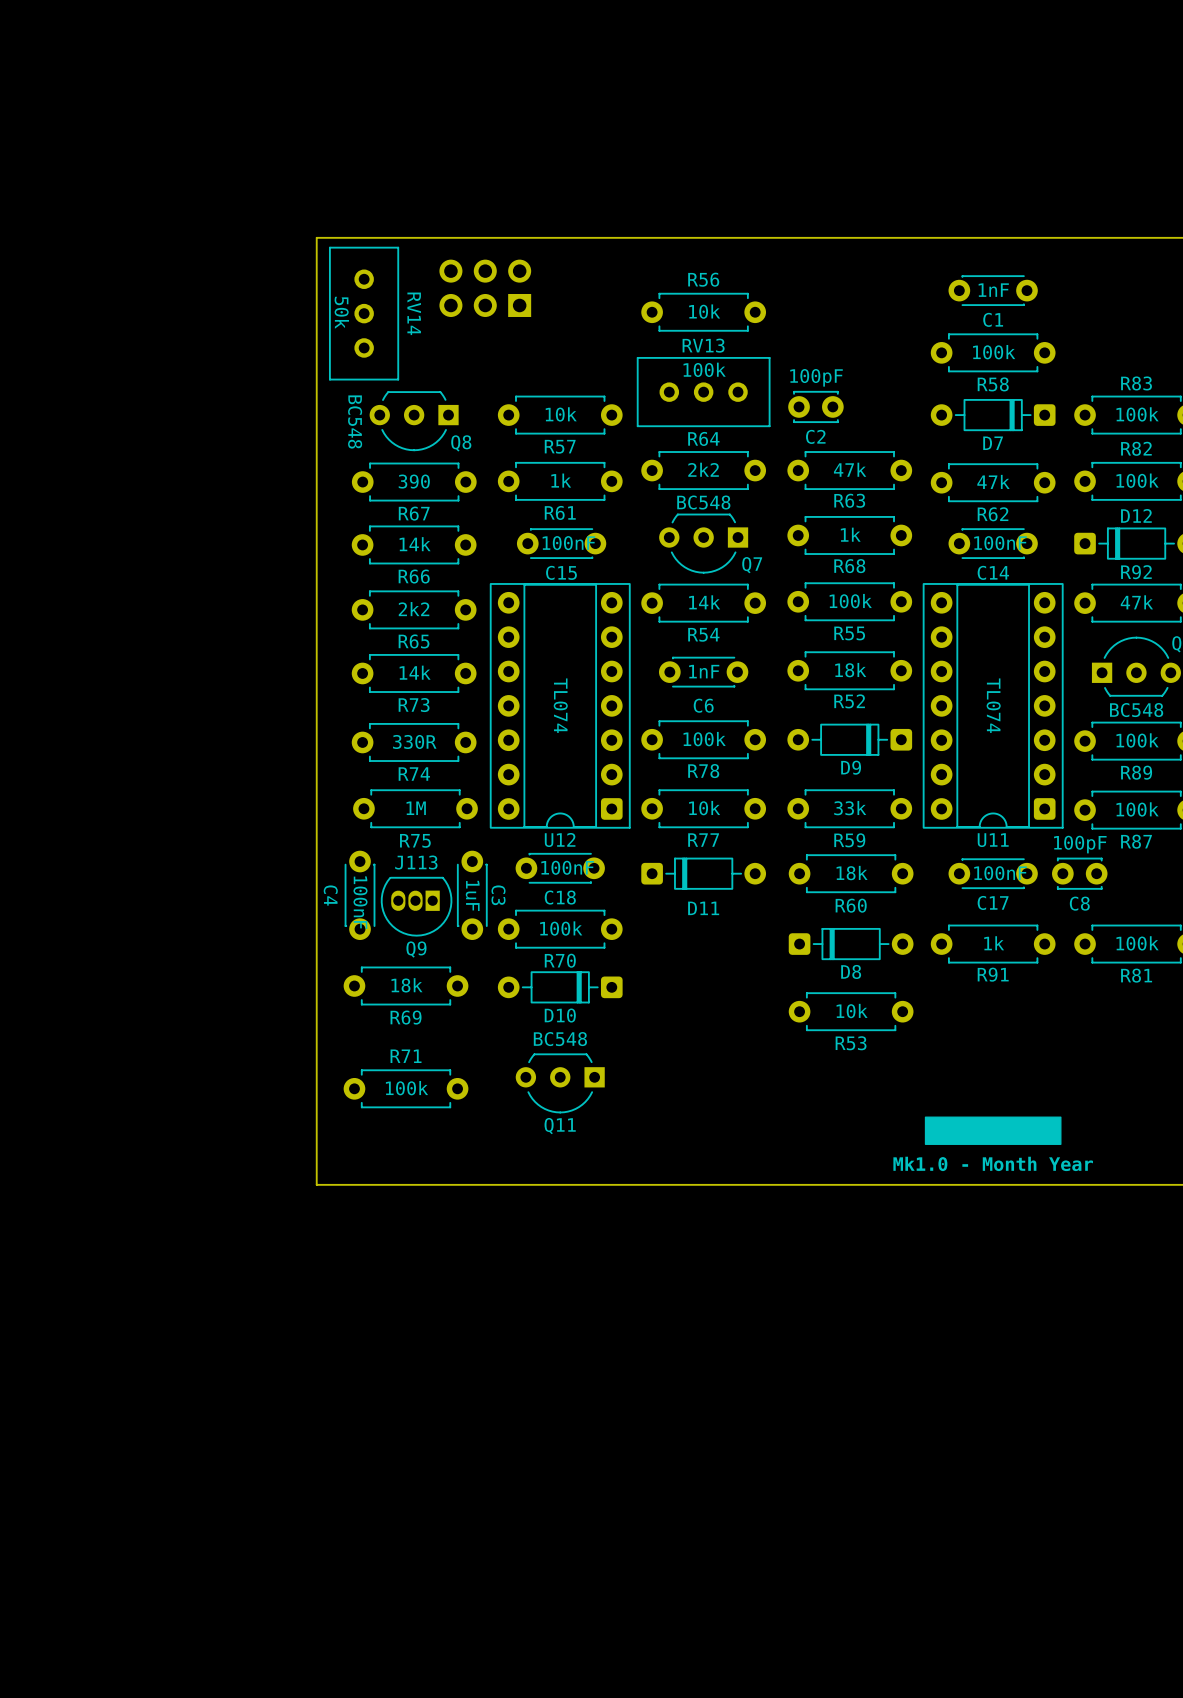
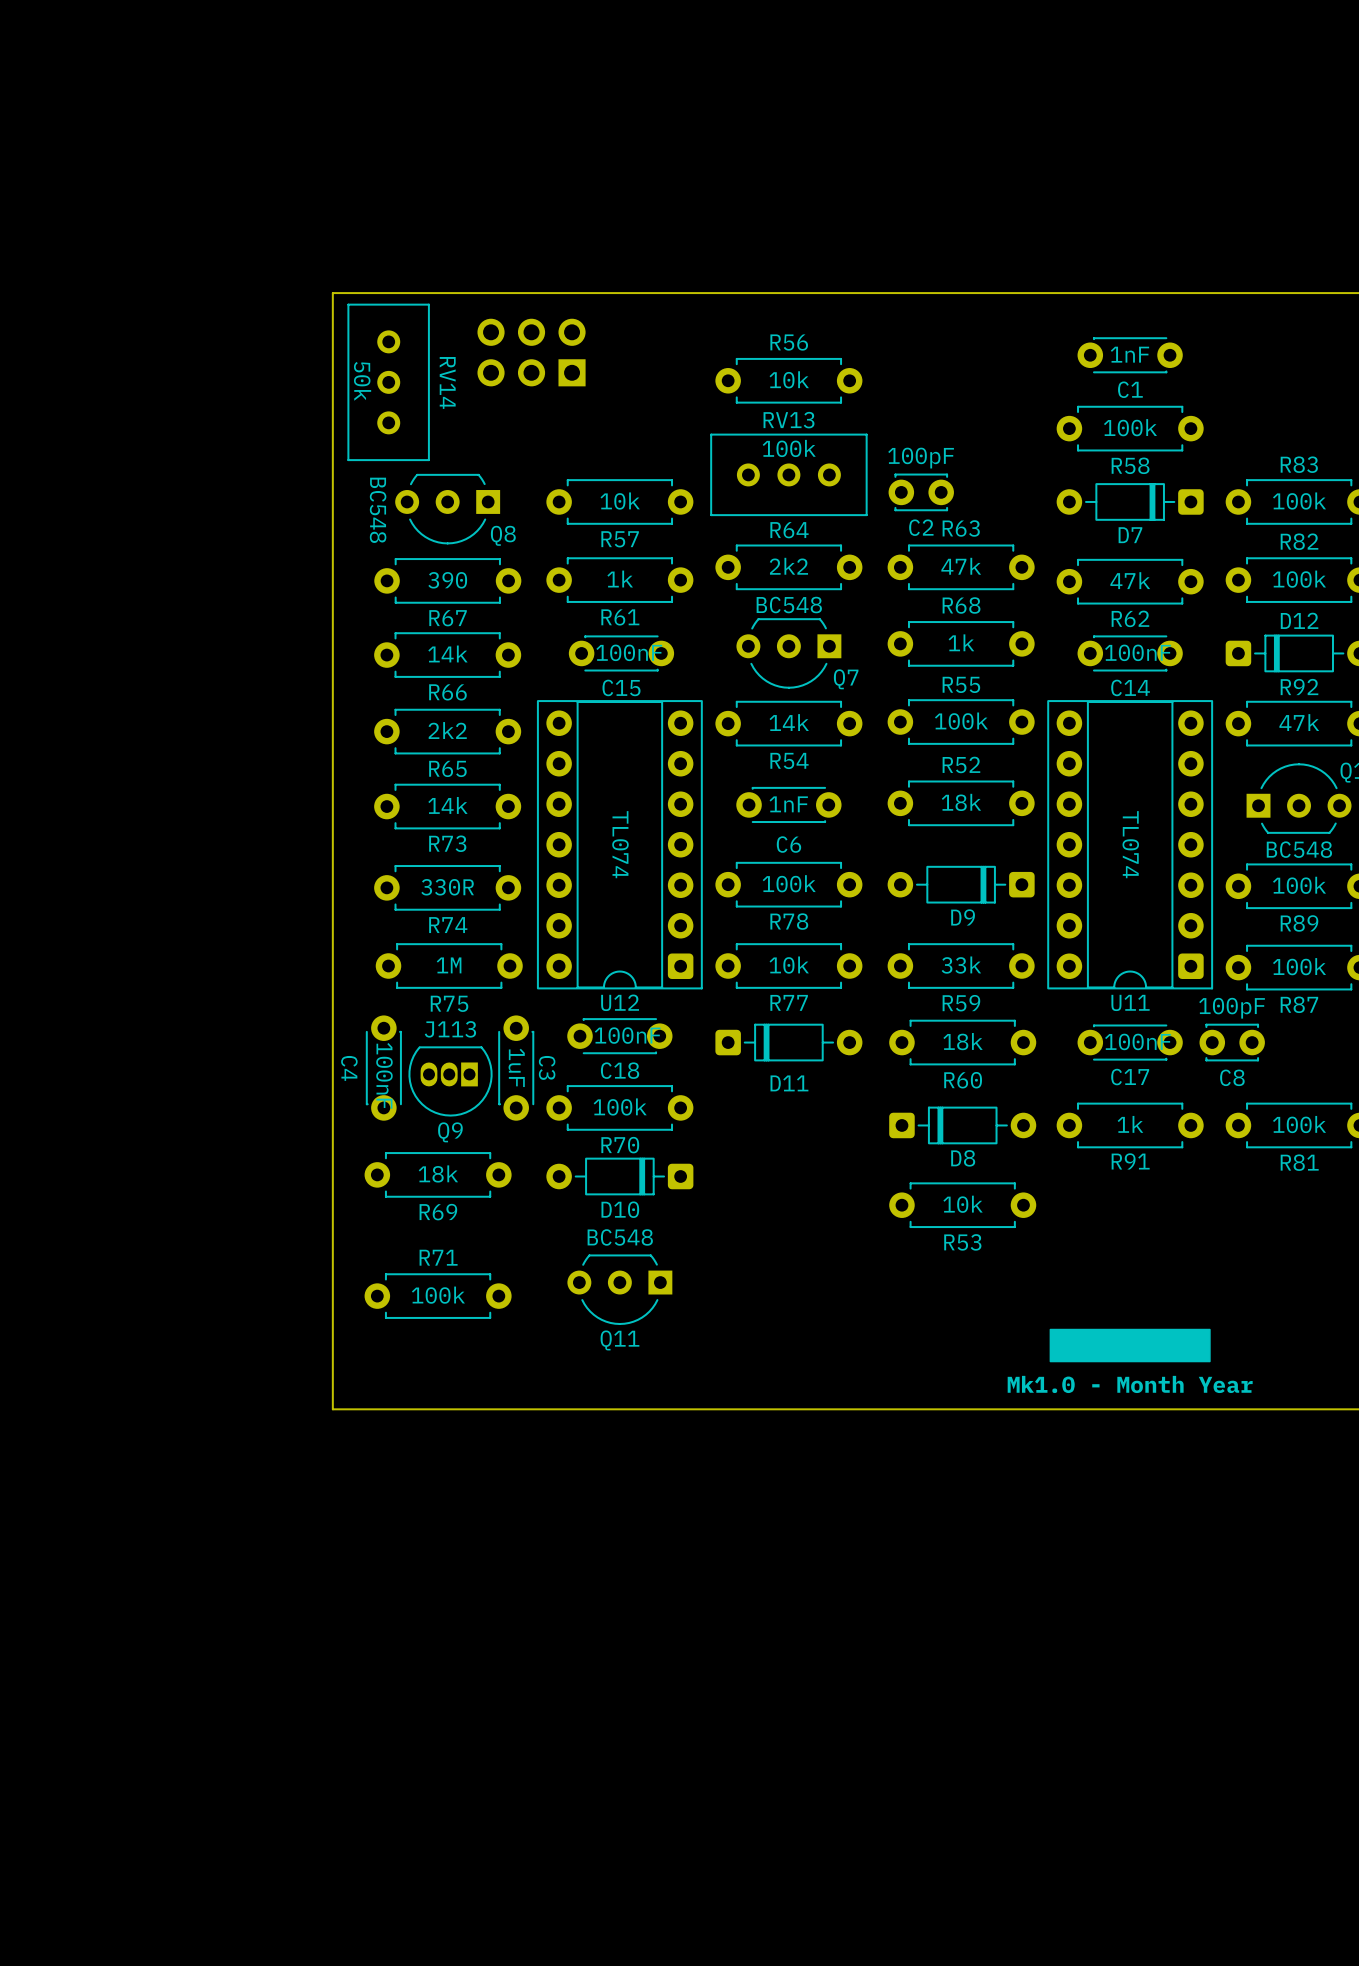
R63 name position: R63 (849, 500) -> R63 (961, 528)
R68 name position: R68 (849, 566) -> R68 (961, 605)
R55 name position: R55 (849, 633) -> R55 (961, 684)
R52 name position: R52 (849, 701) -> R52 (961, 764)

